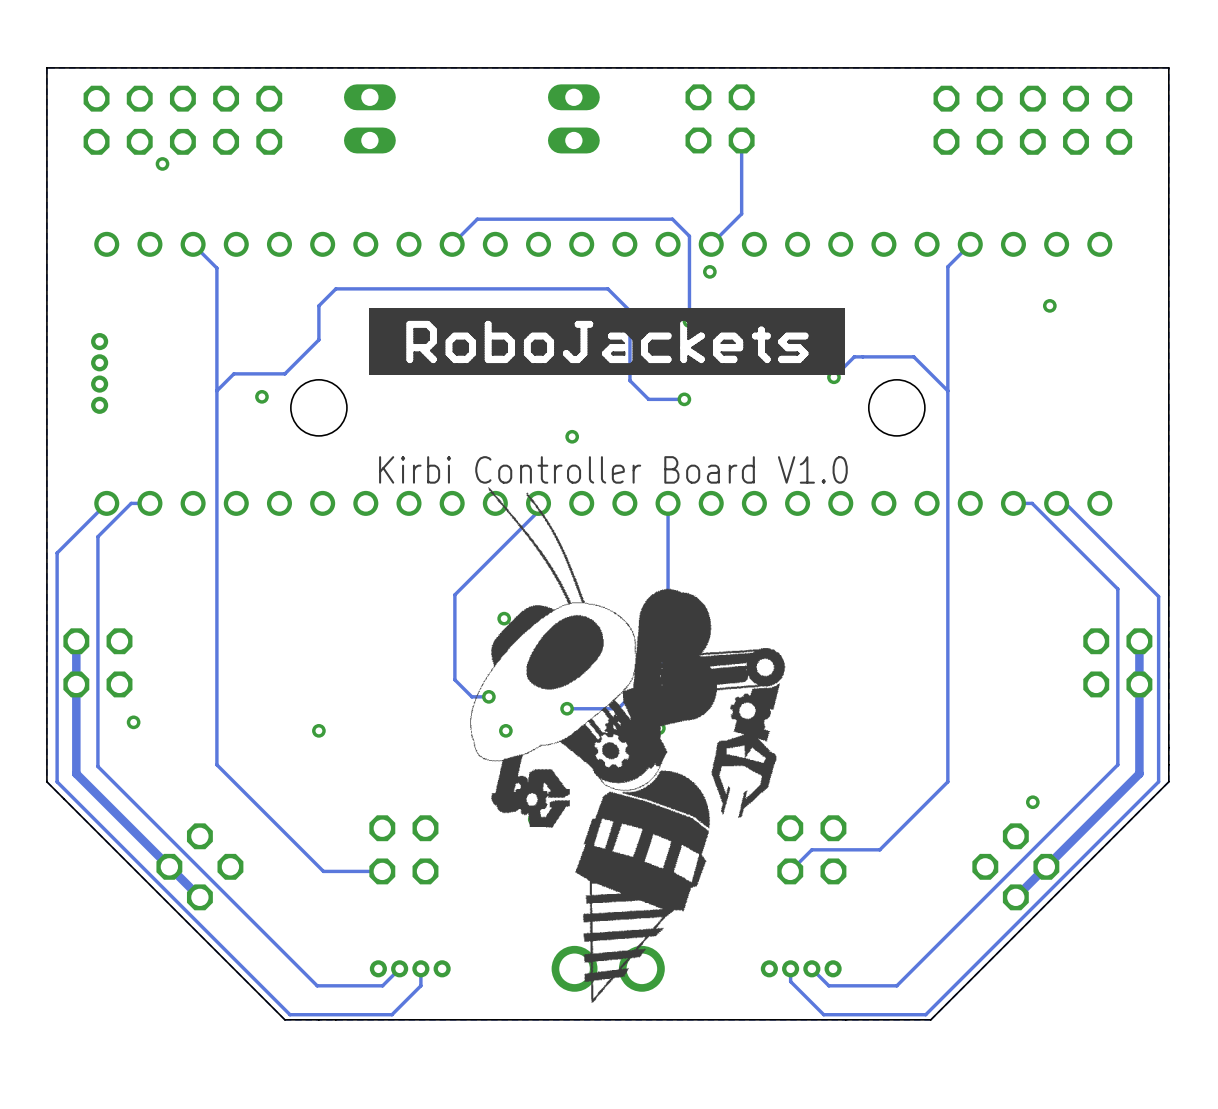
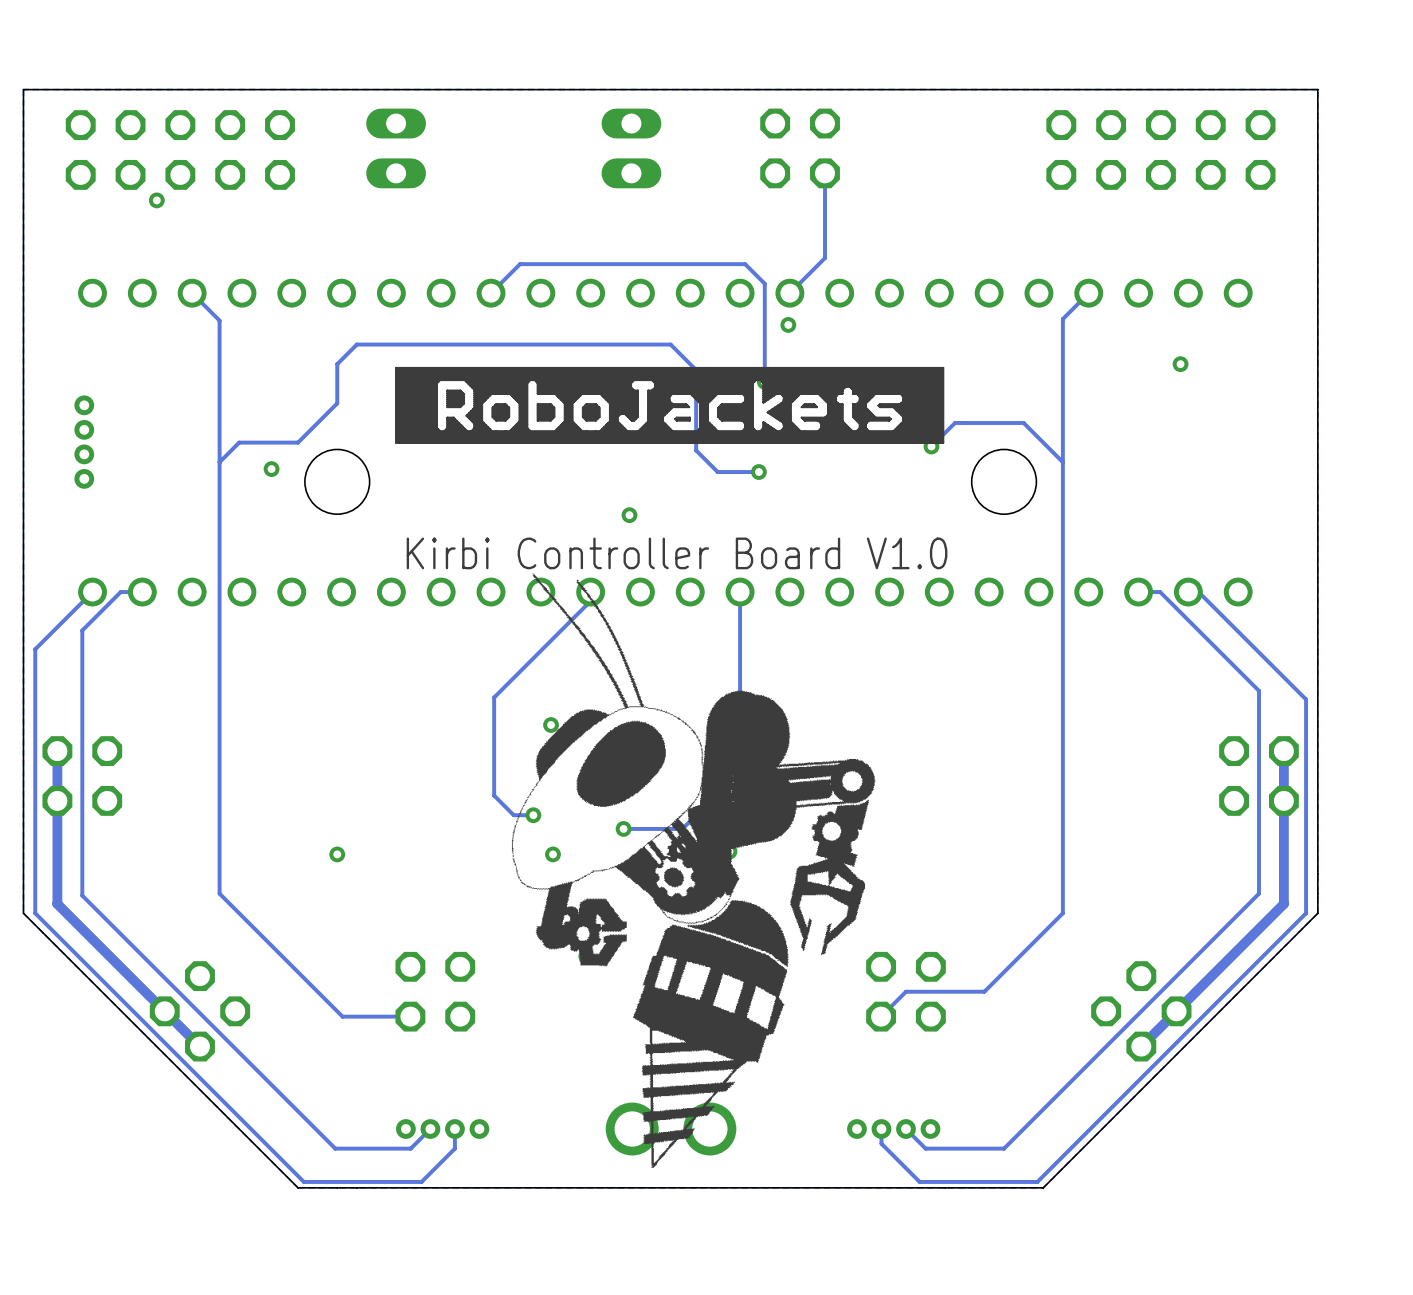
via: (133, 722) -> none
via: (1032, 802) -> none

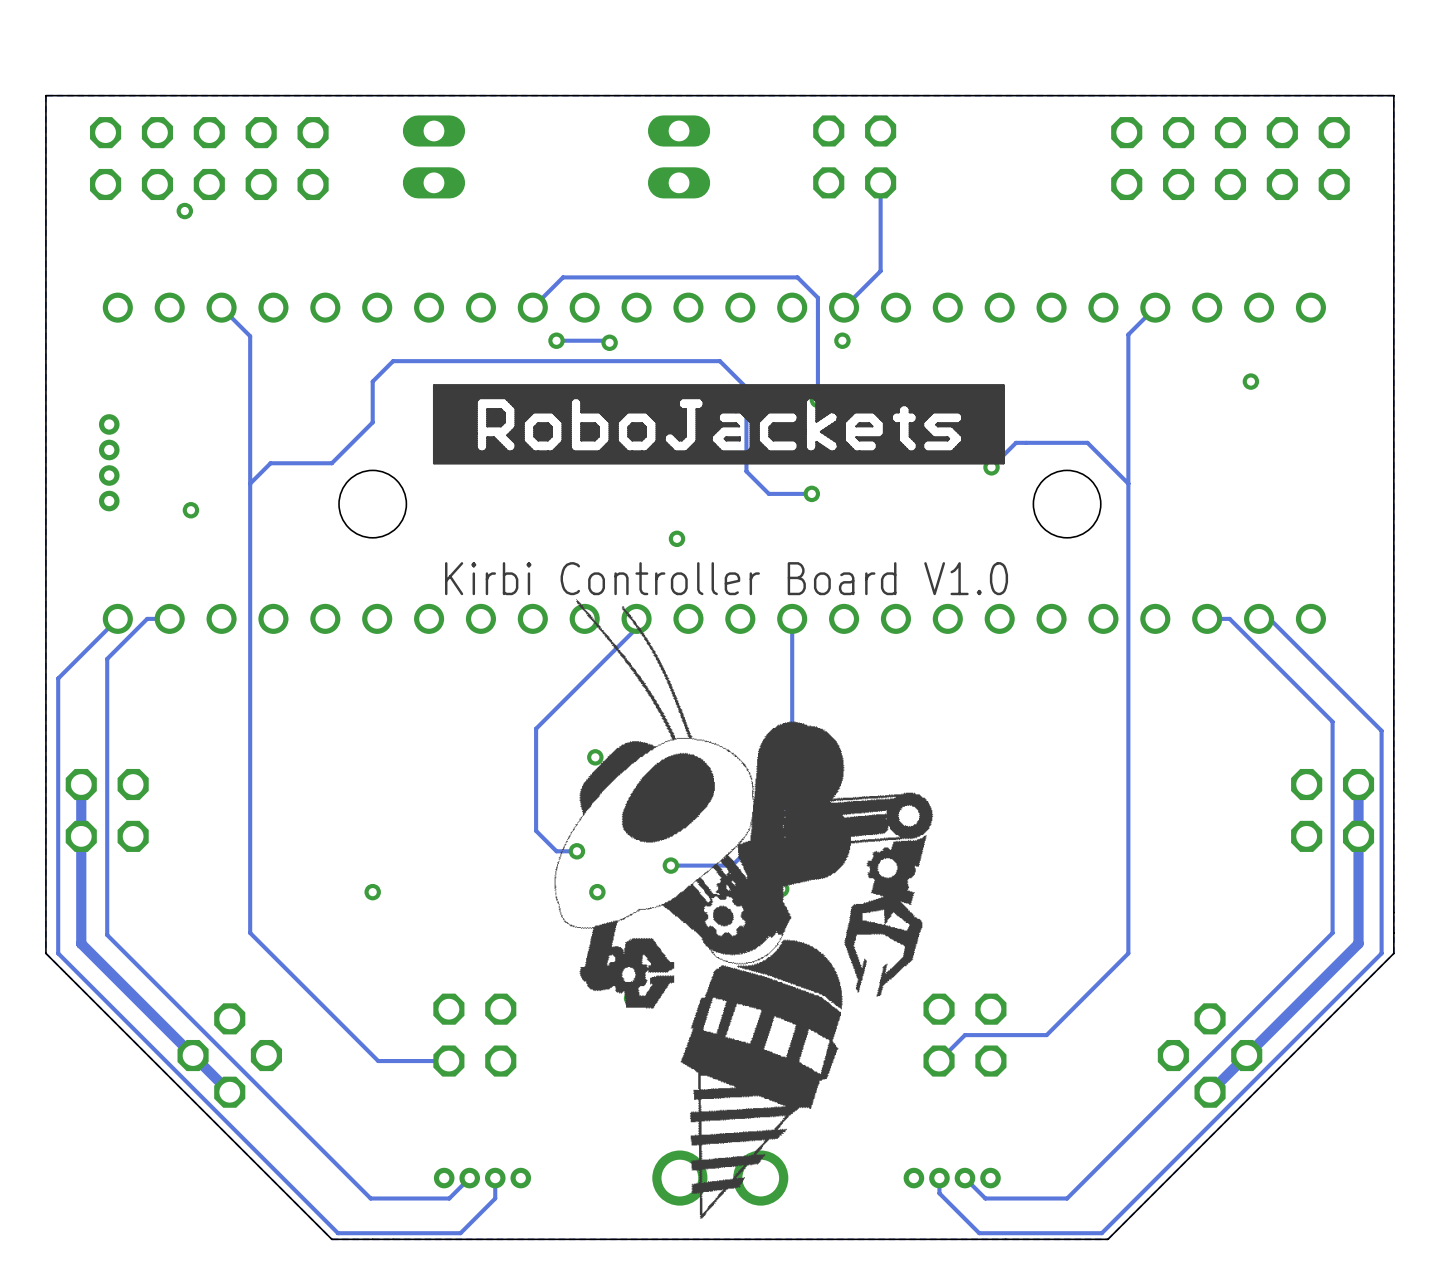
track: none -> (556, 340) (607, 340) (609, 342)
via: none -> (556, 340)
via: none -> (609, 342)
via position: (271, 469) -> (190, 510)

